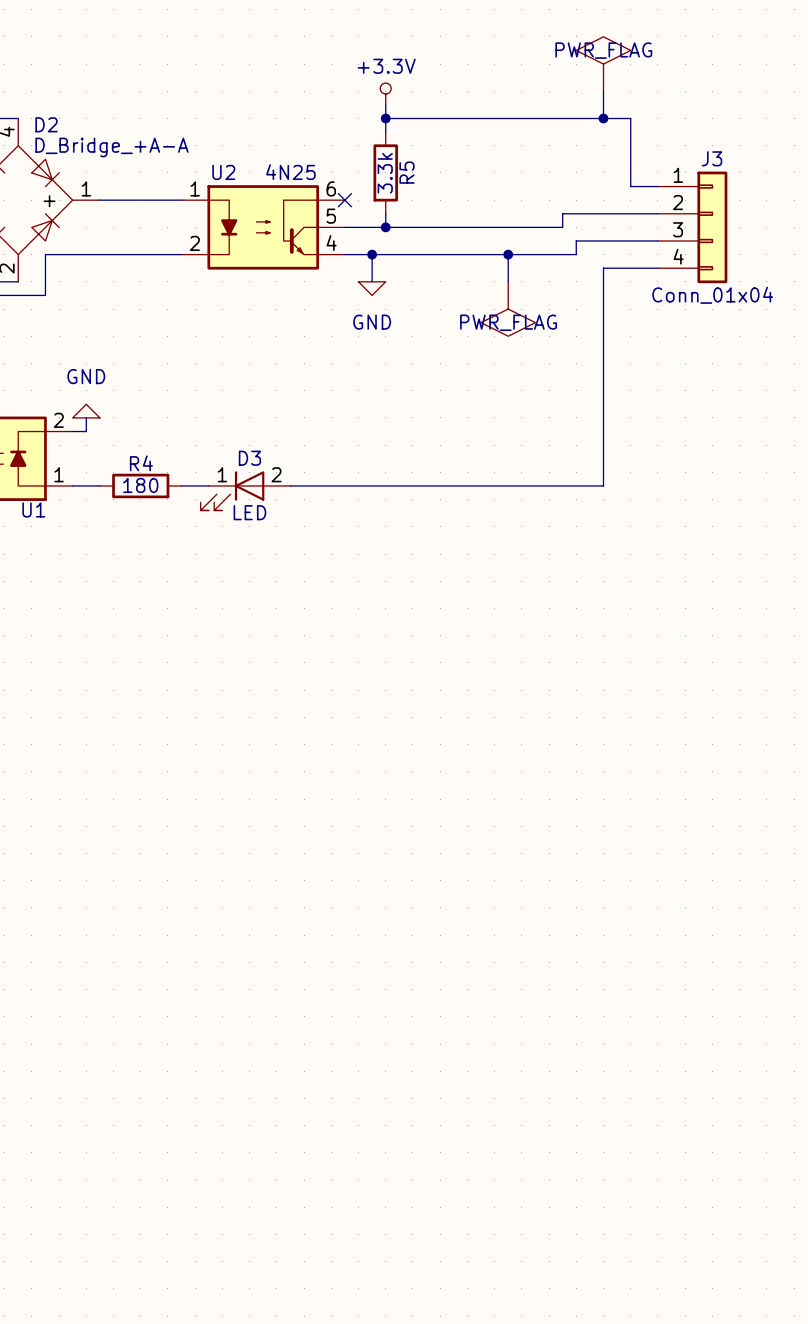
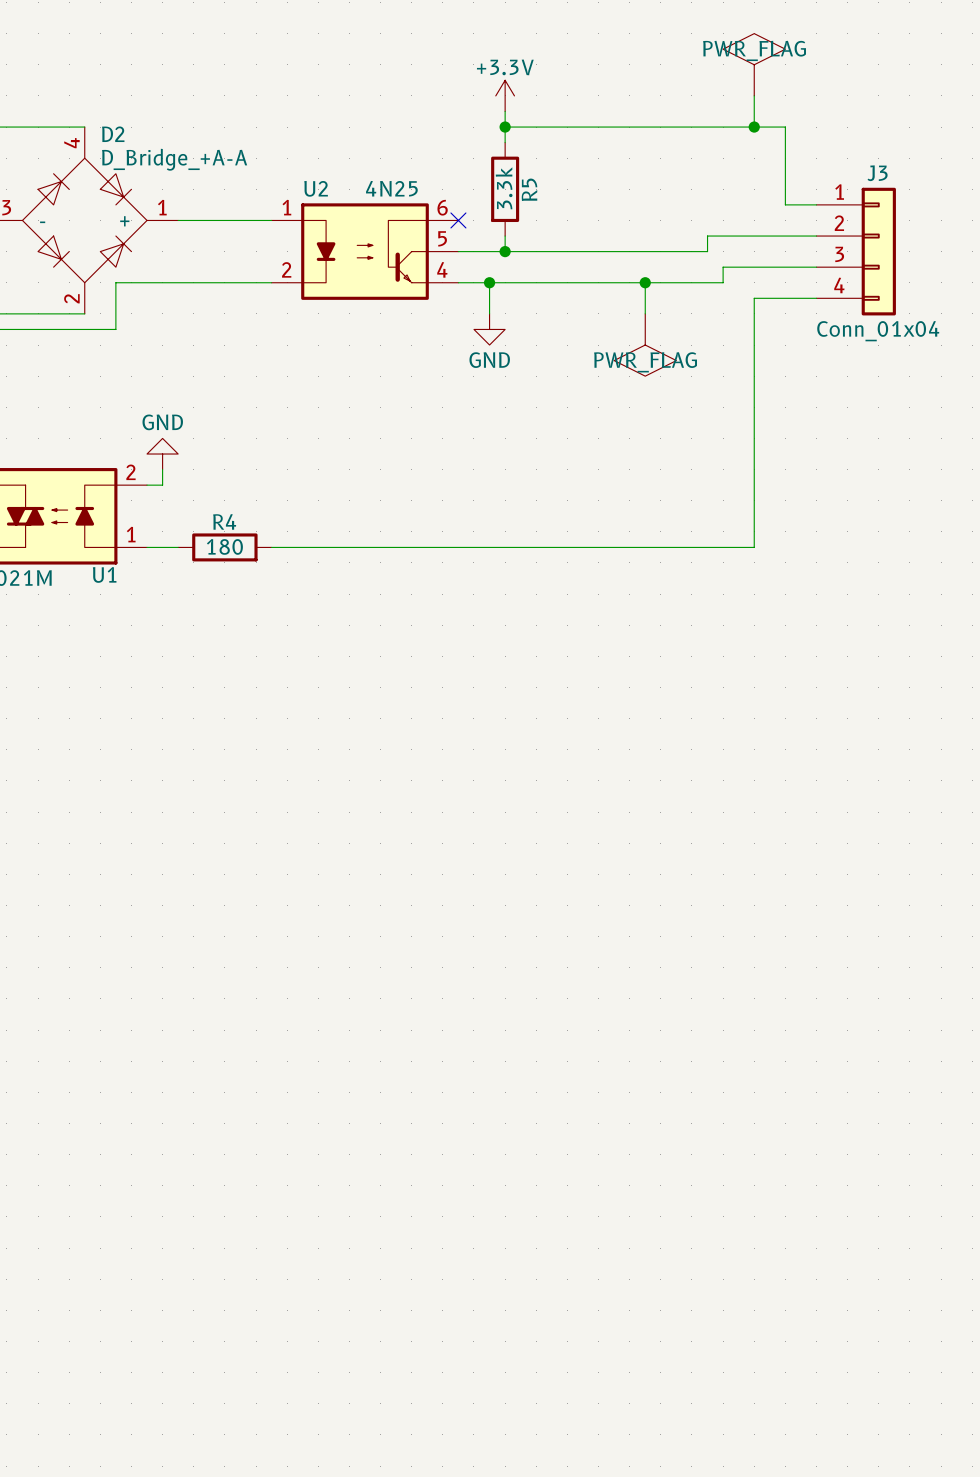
power symbol shape: [380, 83, 392, 105] -> [495, 80, 515, 112]
power symbol shape: [358, 281, 386, 296] -> [473, 313, 506, 346]
power symbol shape: [72, 404, 100, 418] -> [147, 438, 179, 470]
D3: LED (245, 490) -> none

